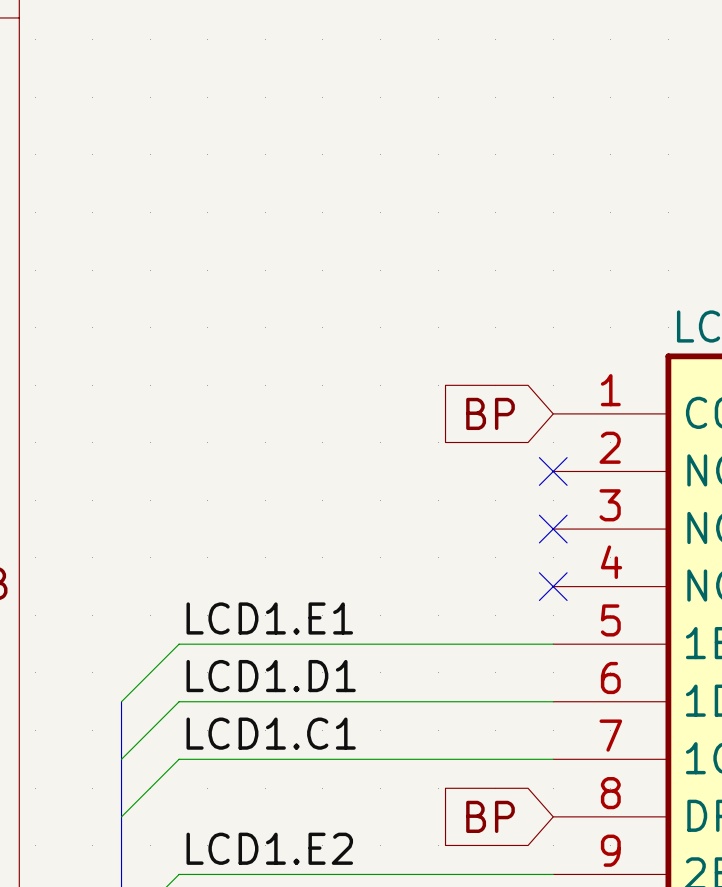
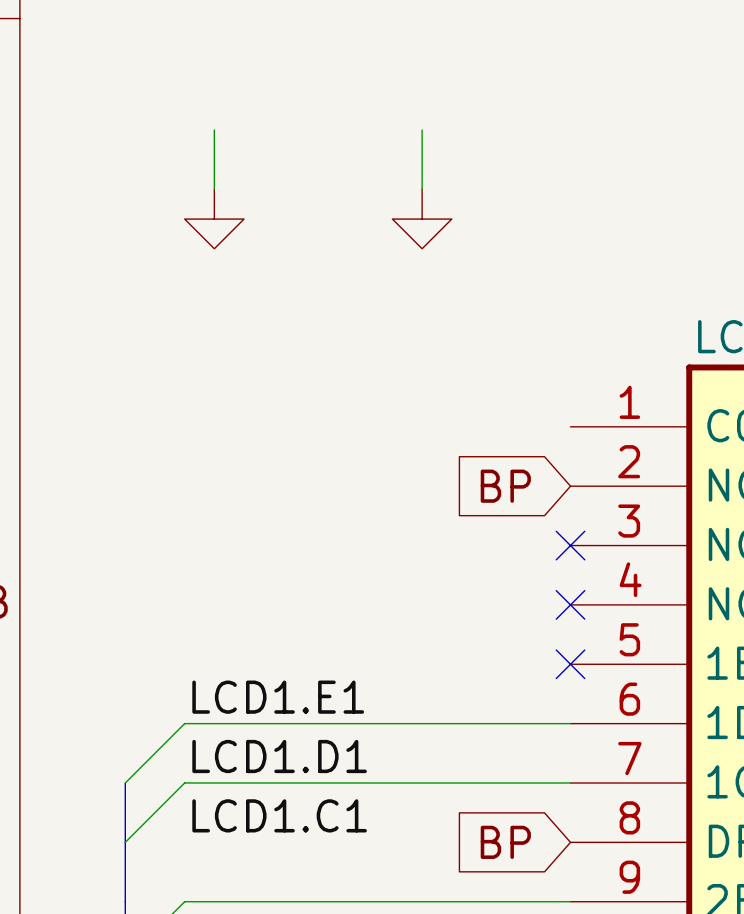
wire: none -> (214, 130) (214, 189)
wire: none -> (422, 130) (422, 189)
power symbol: none -> (214, 219)
power symbol: none -> (422, 219)
global label position: BP (490, 413) -> BP (505, 486)
no-connect mark: (553, 471) -> none
label: LCD1.E1 (269, 618) -> none
wire: (553, 644) (179, 644) (121, 701) -> none
no-connect mark: none -> (570, 664)
label: LCD1.D1 (271, 676) -> LCD1.E1 (278, 697)
bus: (121, 701) (121, 759) -> none
label: LCD1.C1 (271, 733) -> LCD1.D1 (279, 756)
label: LCD1.E2 (269, 848) -> LCD1.C1 (279, 815)

